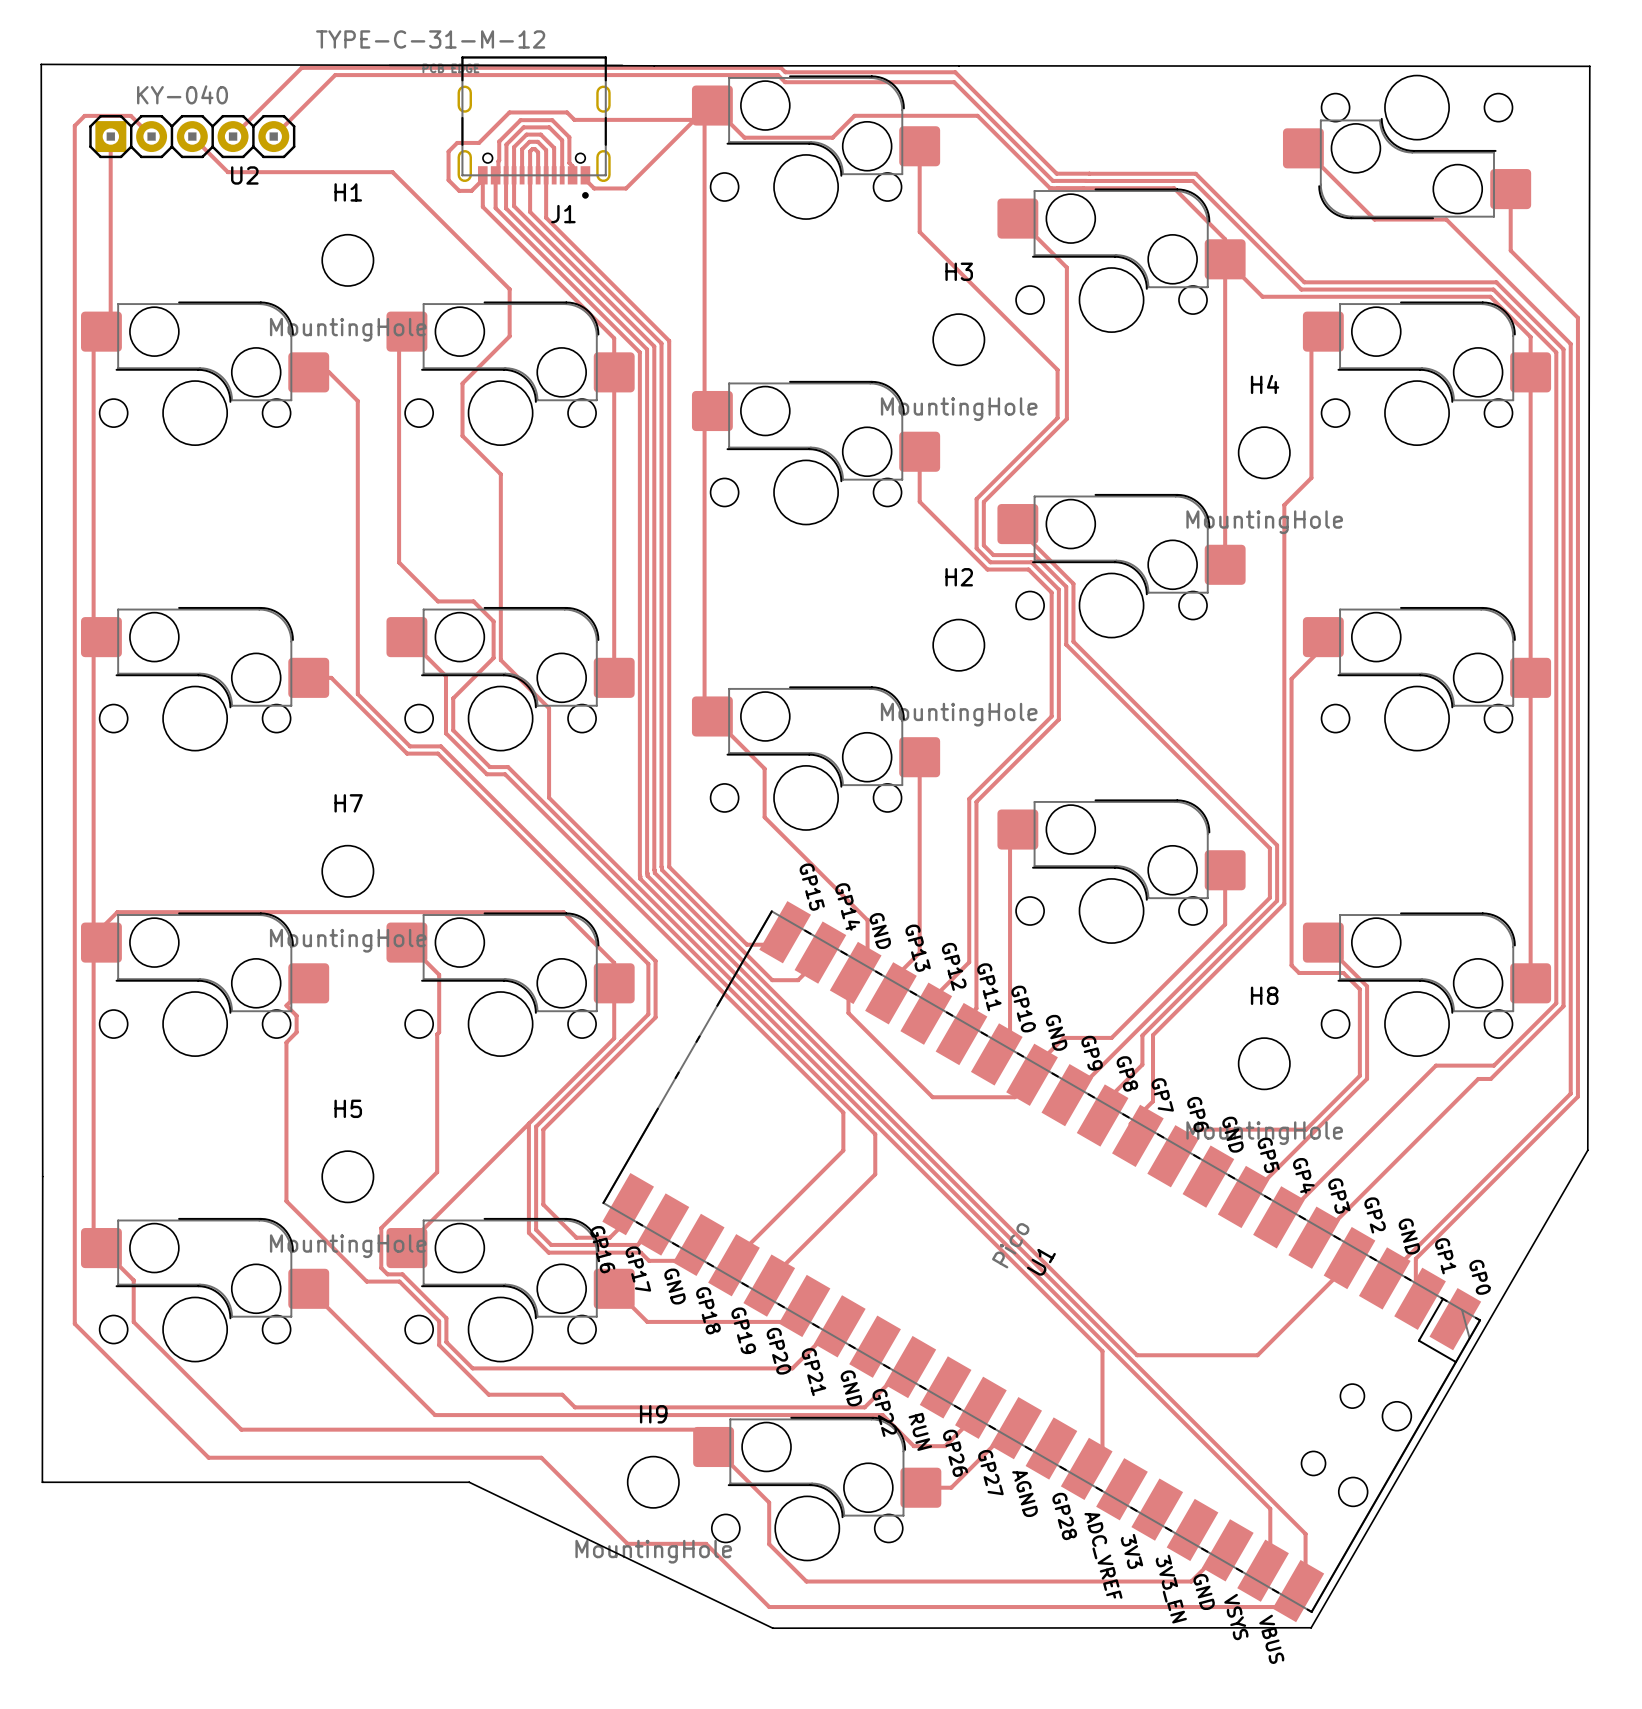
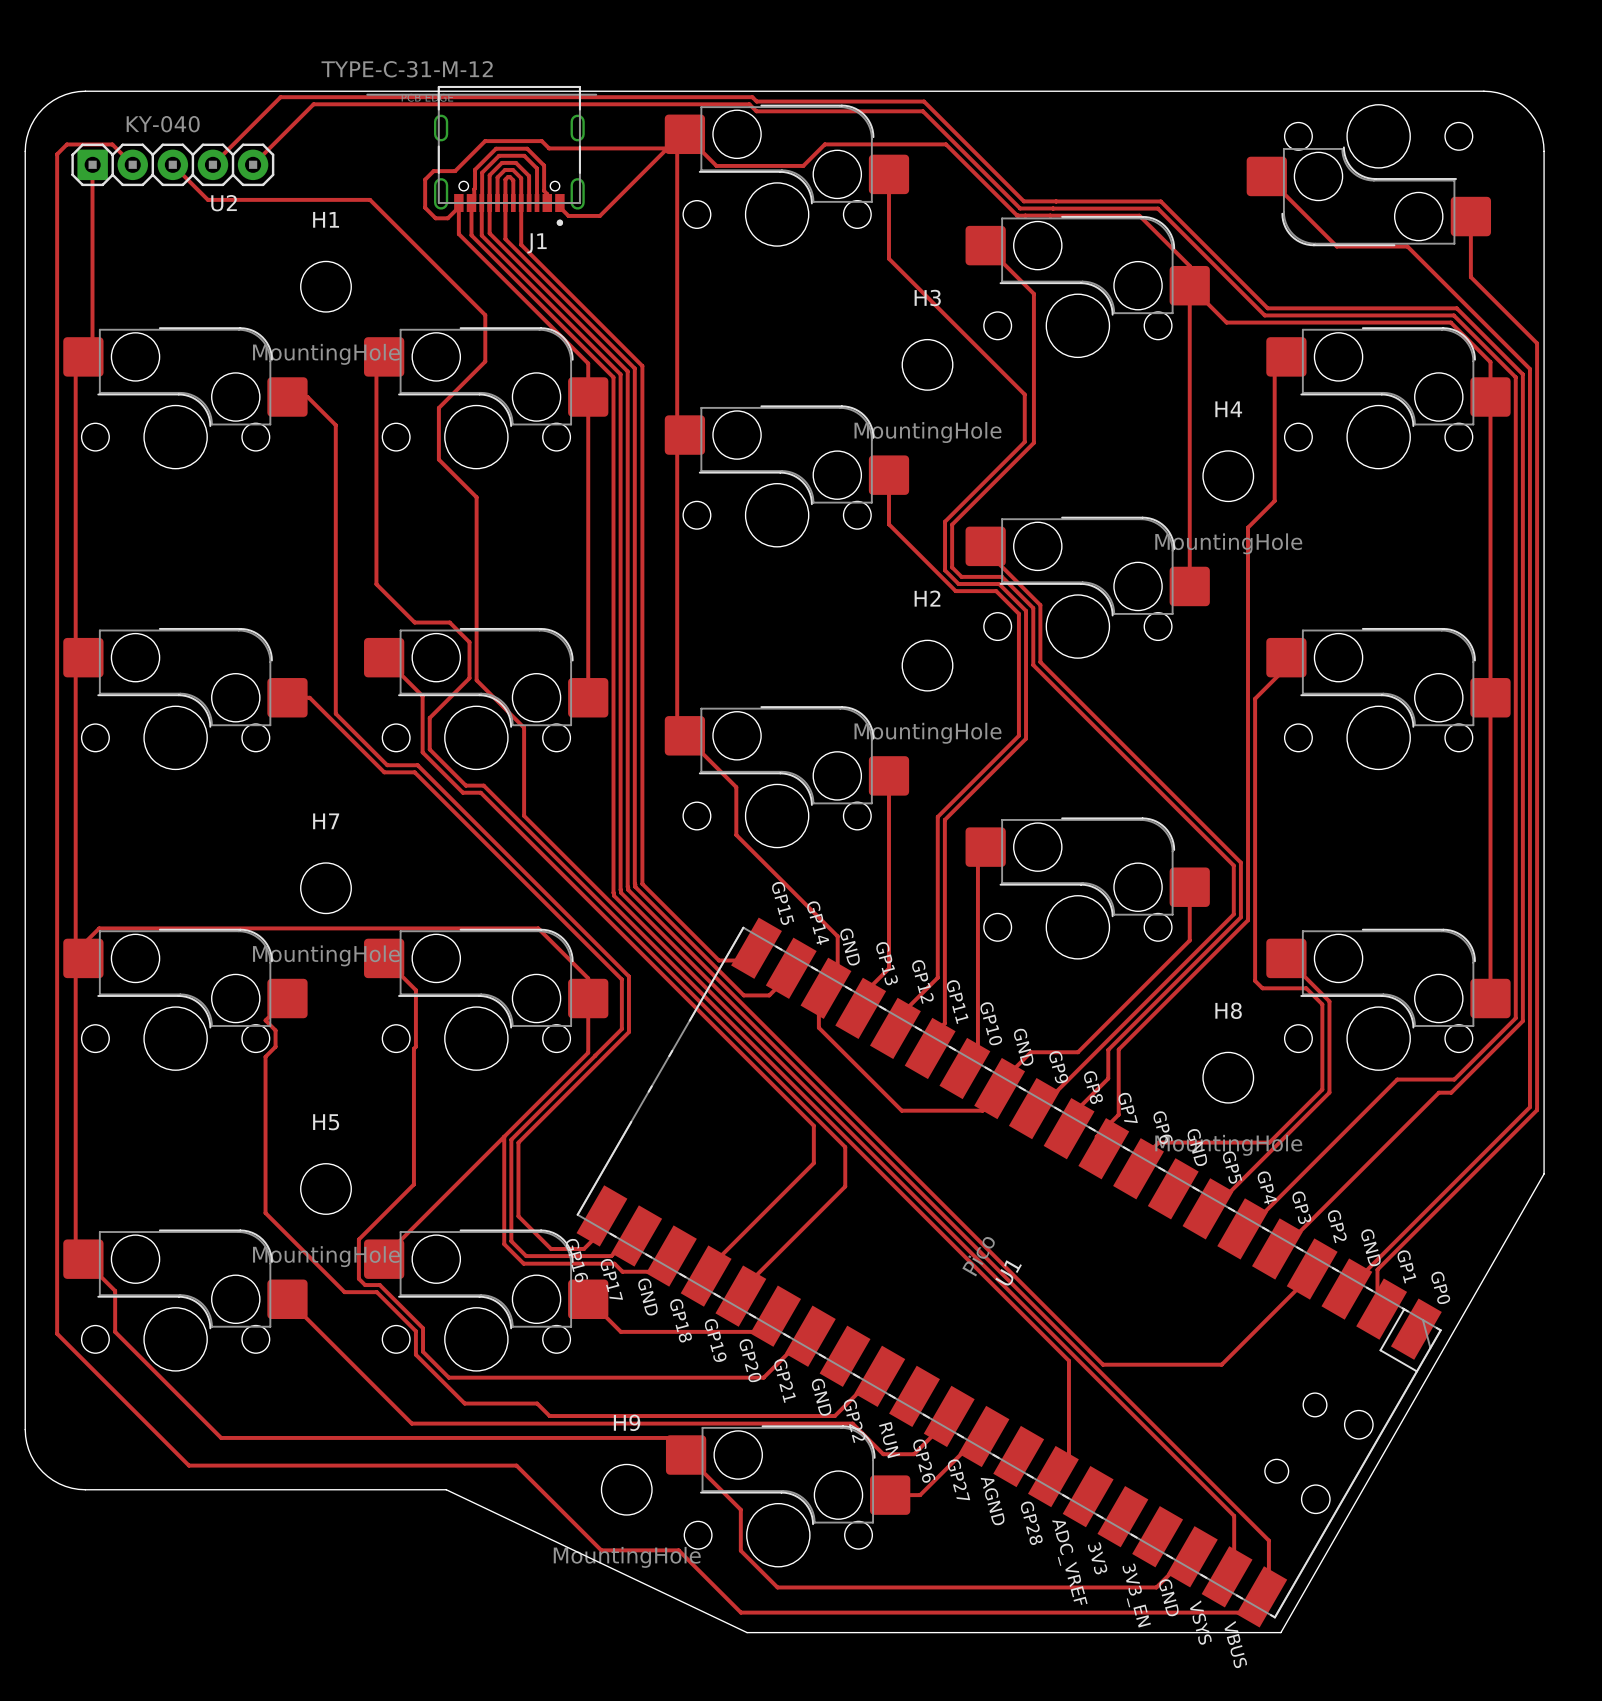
board edge: (103, 1482) (42, 1482) (41, 64) (1589, 66) (1587, 1150) (1311, 1627) (772, 1628) (469, 1482) -> (85, 1489) (65, 1486) (53, 1480) (42, 1472) (34, 1461) (28, 1449) (25, 1429) (25, 151) (26, 138) (31, 125) (42, 108) (59, 97) (72, 92) (85, 91) (1483, 91) (1503, 94) (1521, 104) (1530, 113) (1538, 125) (1542, 138) (1544, 151) (1544, 1173) (1280, 1632) (747, 1632) (445, 1489)

